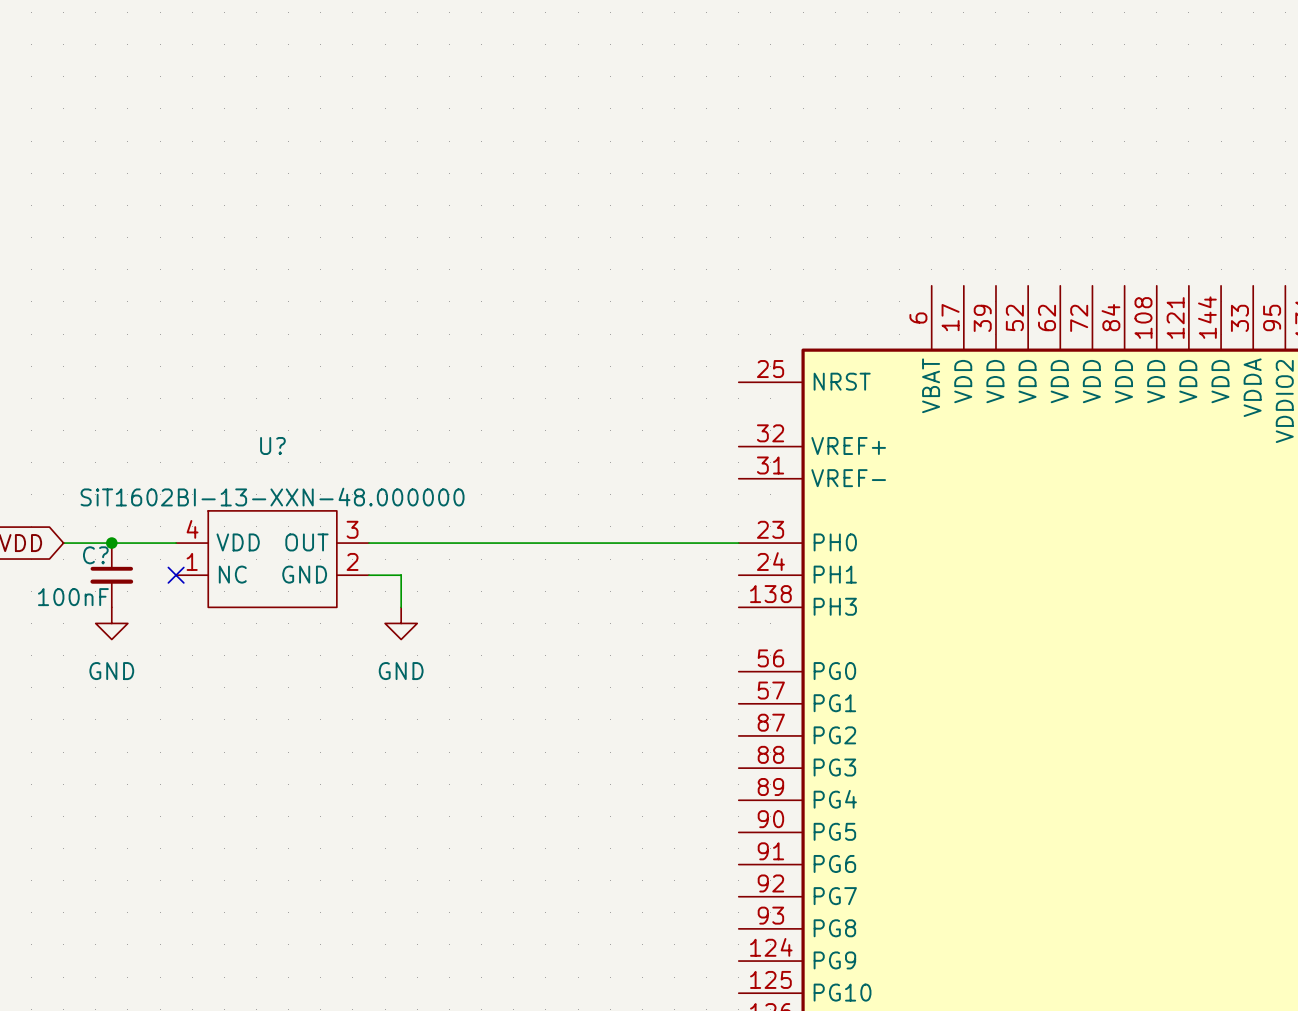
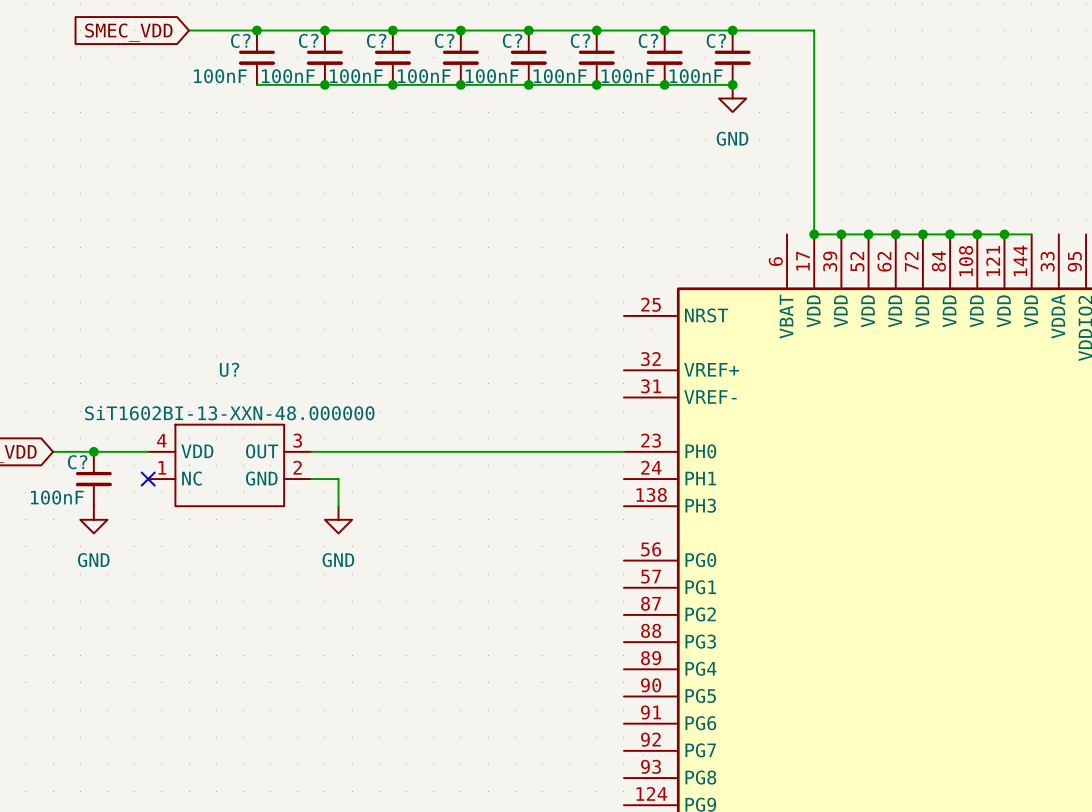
wire: none -> (189, 30) (814, 30) (814, 234) (1031, 234)
junction: none -> (256, 30)
junction: none -> (324, 30)
junction: none -> (392, 30)
junction: none -> (460, 30)
junction: none -> (528, 30)
junction: none -> (596, 30)
junction: none -> (664, 30)
junction: none -> (732, 30)
global label: none -> SMEC_VDD (128, 32)
C?: none -> 100nF (256, 57)
C?: none -> 100nF (324, 57)
C?: none -> 100nF (392, 57)
C?: none -> 100nF (460, 57)
C?: none -> 100nF (528, 57)
C?: none -> 100nF (596, 57)
C?: none -> 100nF (664, 57)
C?: none -> 100nF (732, 57)
wire: none -> (256, 84) (732, 84)
junction: none -> (324, 84)
junction: none -> (392, 84)
junction: none -> (460, 84)
junction: none -> (528, 84)
junction: none -> (596, 84)
junction: none -> (664, 84)
junction: none -> (732, 84)
power symbol: none -> GND (732, 98)
junction: none -> (814, 234)
junction: none -> (841, 234)
junction: none -> (868, 234)
junction: none -> (895, 234)
junction: none -> (922, 234)
junction: none -> (950, 234)
junction: none -> (977, 234)
junction: none -> (1004, 234)

